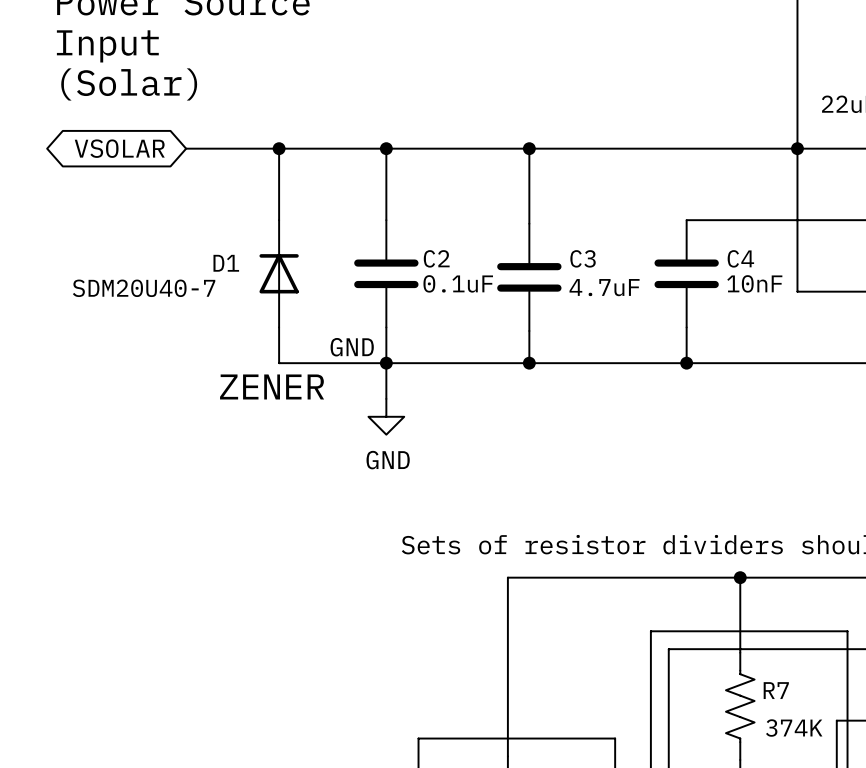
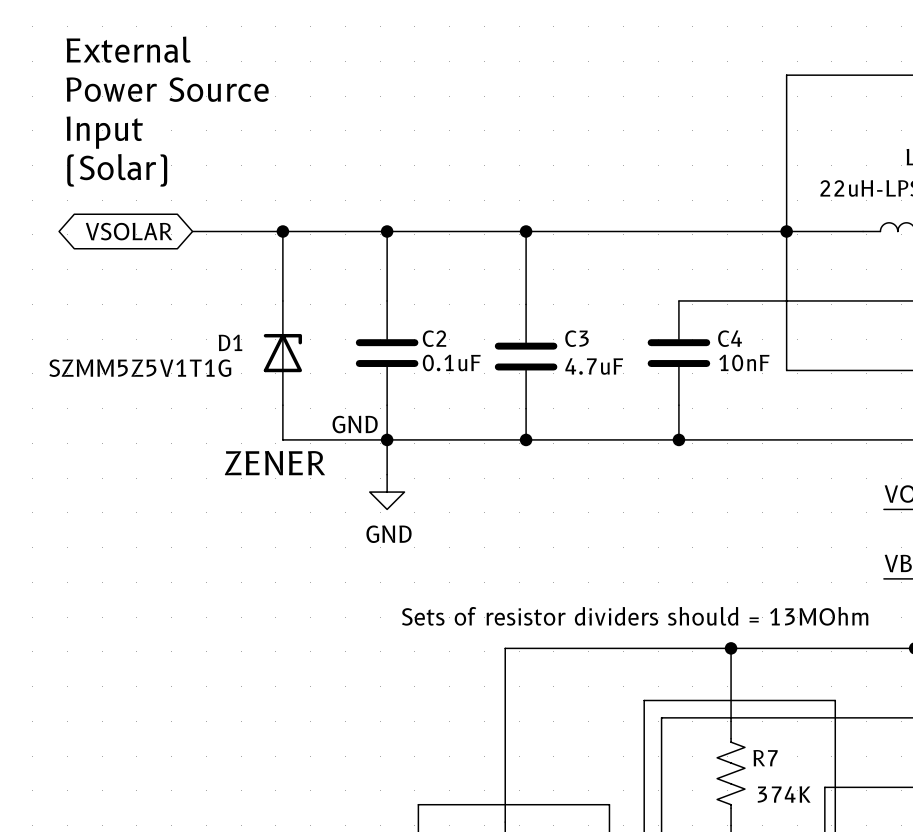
D1 symbol: [259, 220, 299, 328] -> [263, 300, 303, 406]
D1 value: SDM20U40-7 (144, 288) -> SZMM5Z5V1T1G (140, 368)

